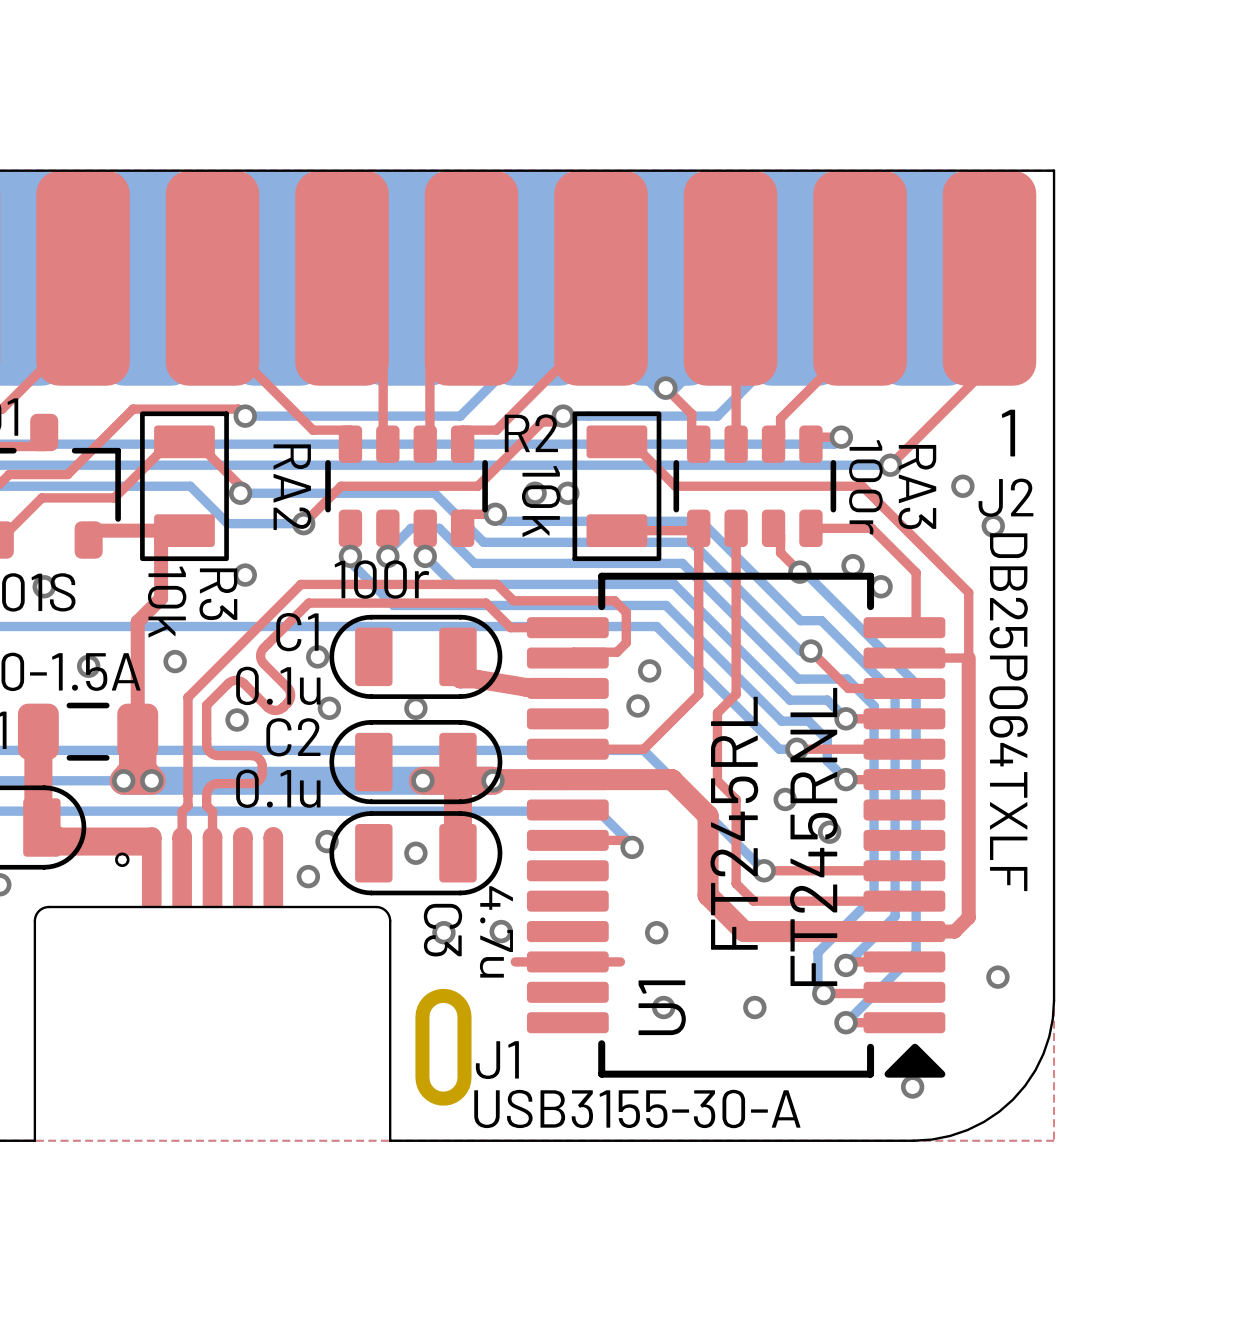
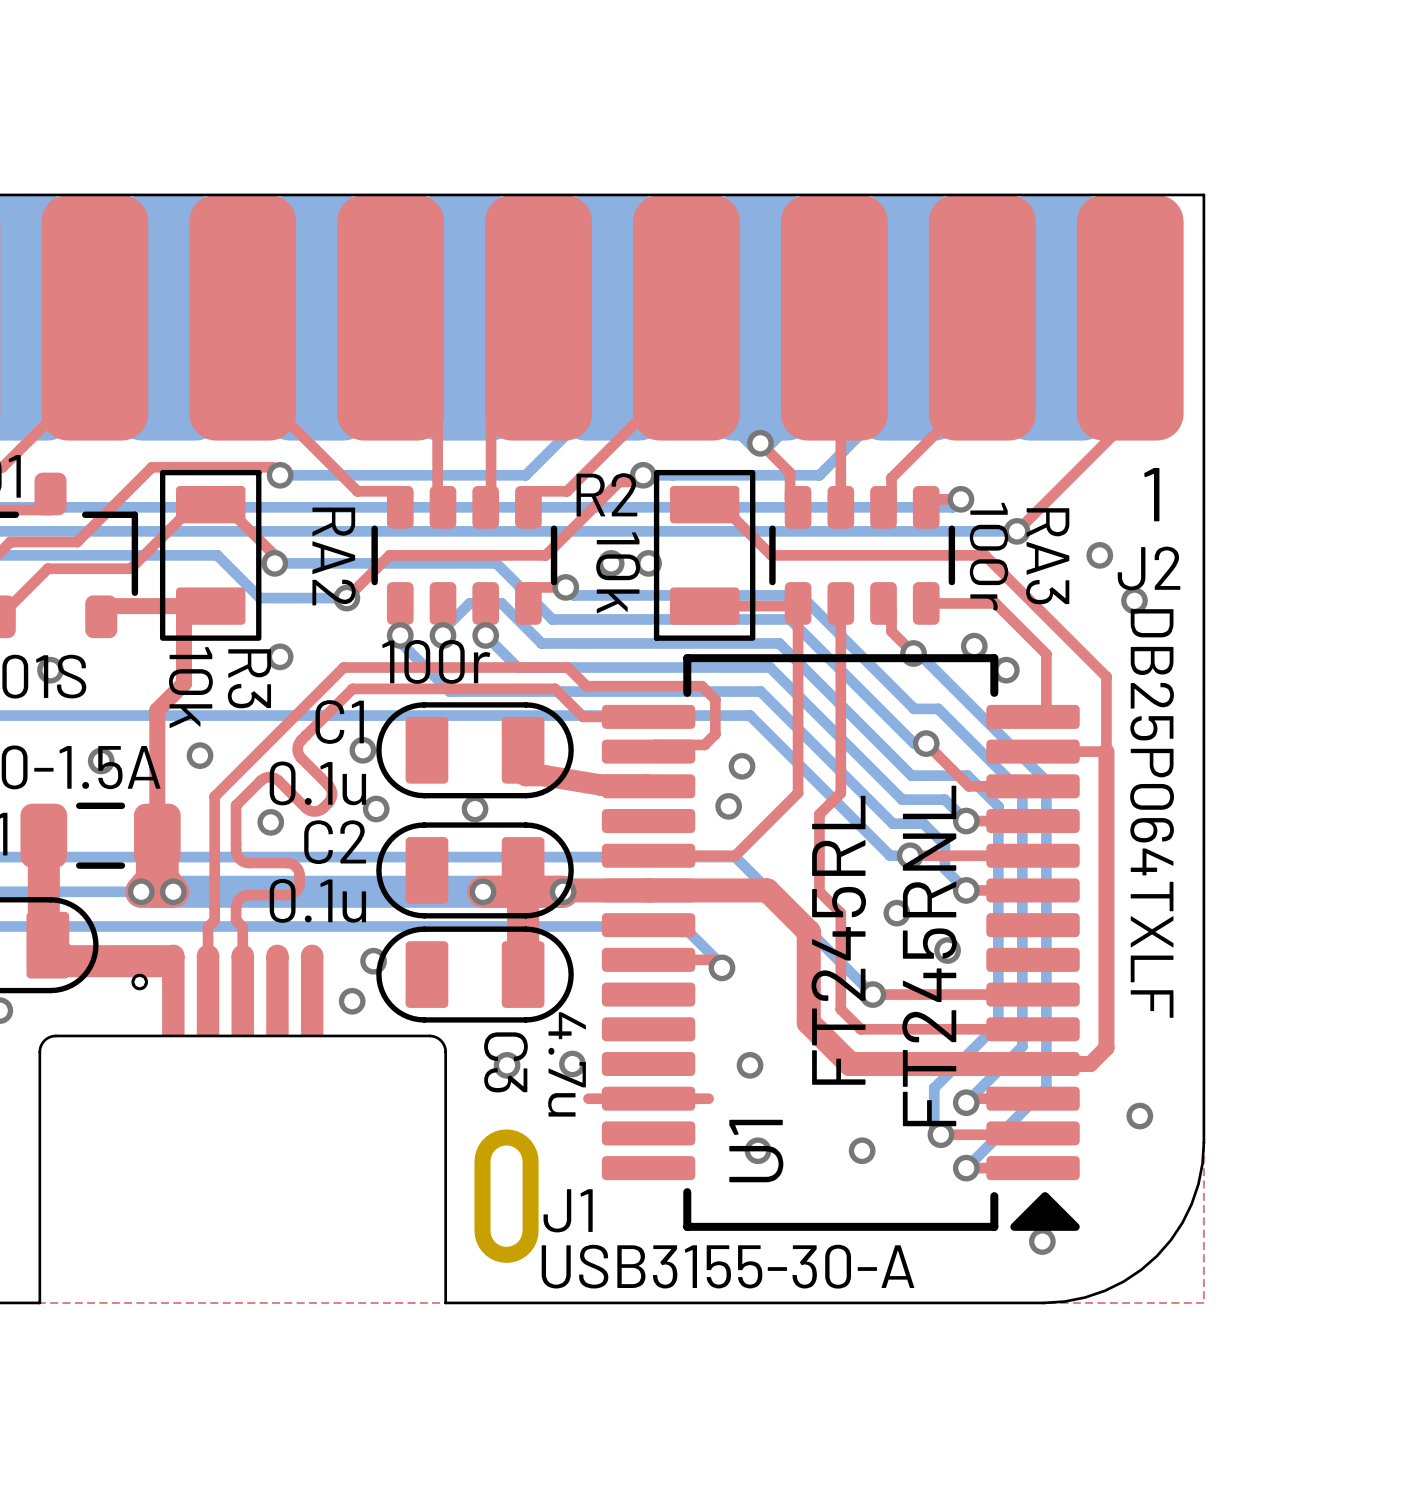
via: (415, 853) -> none

